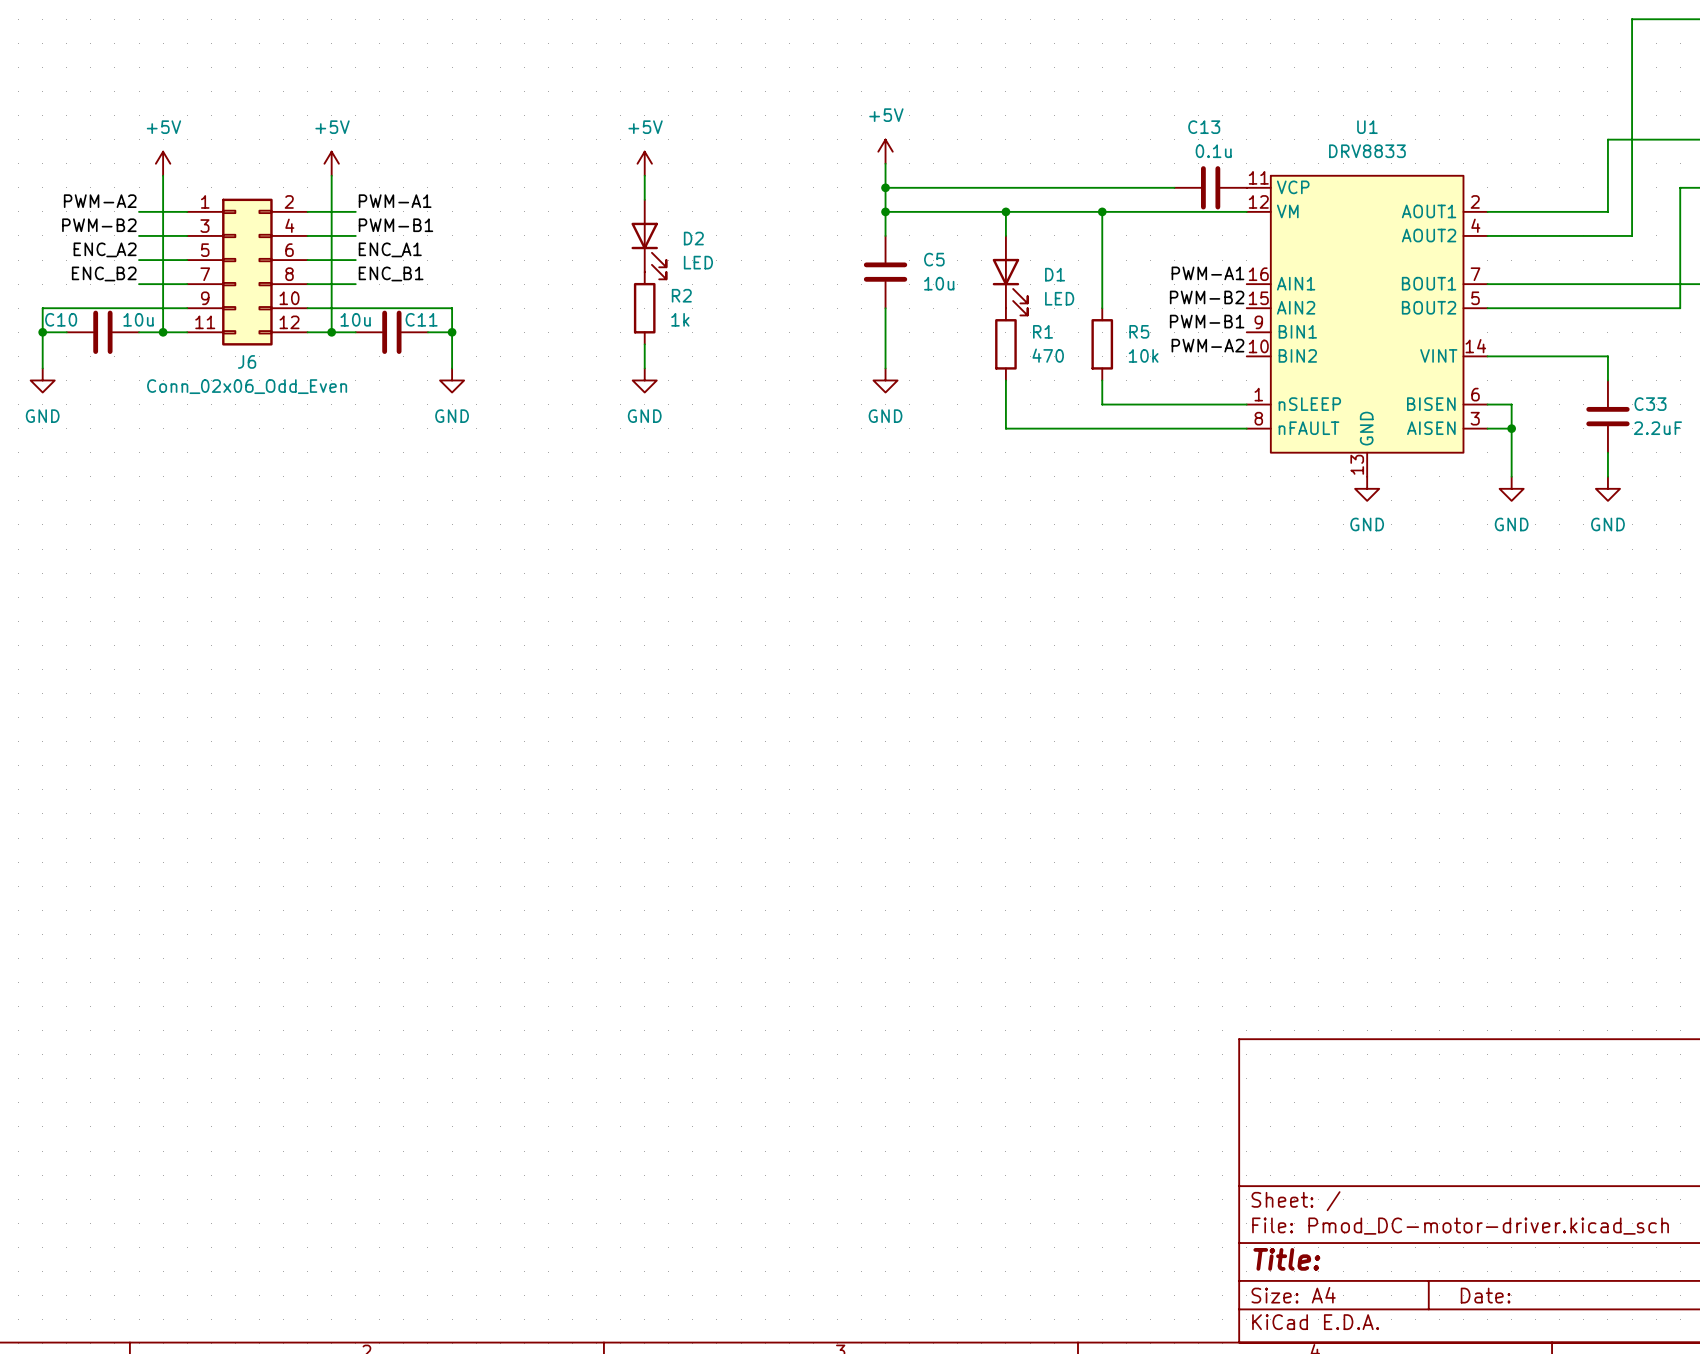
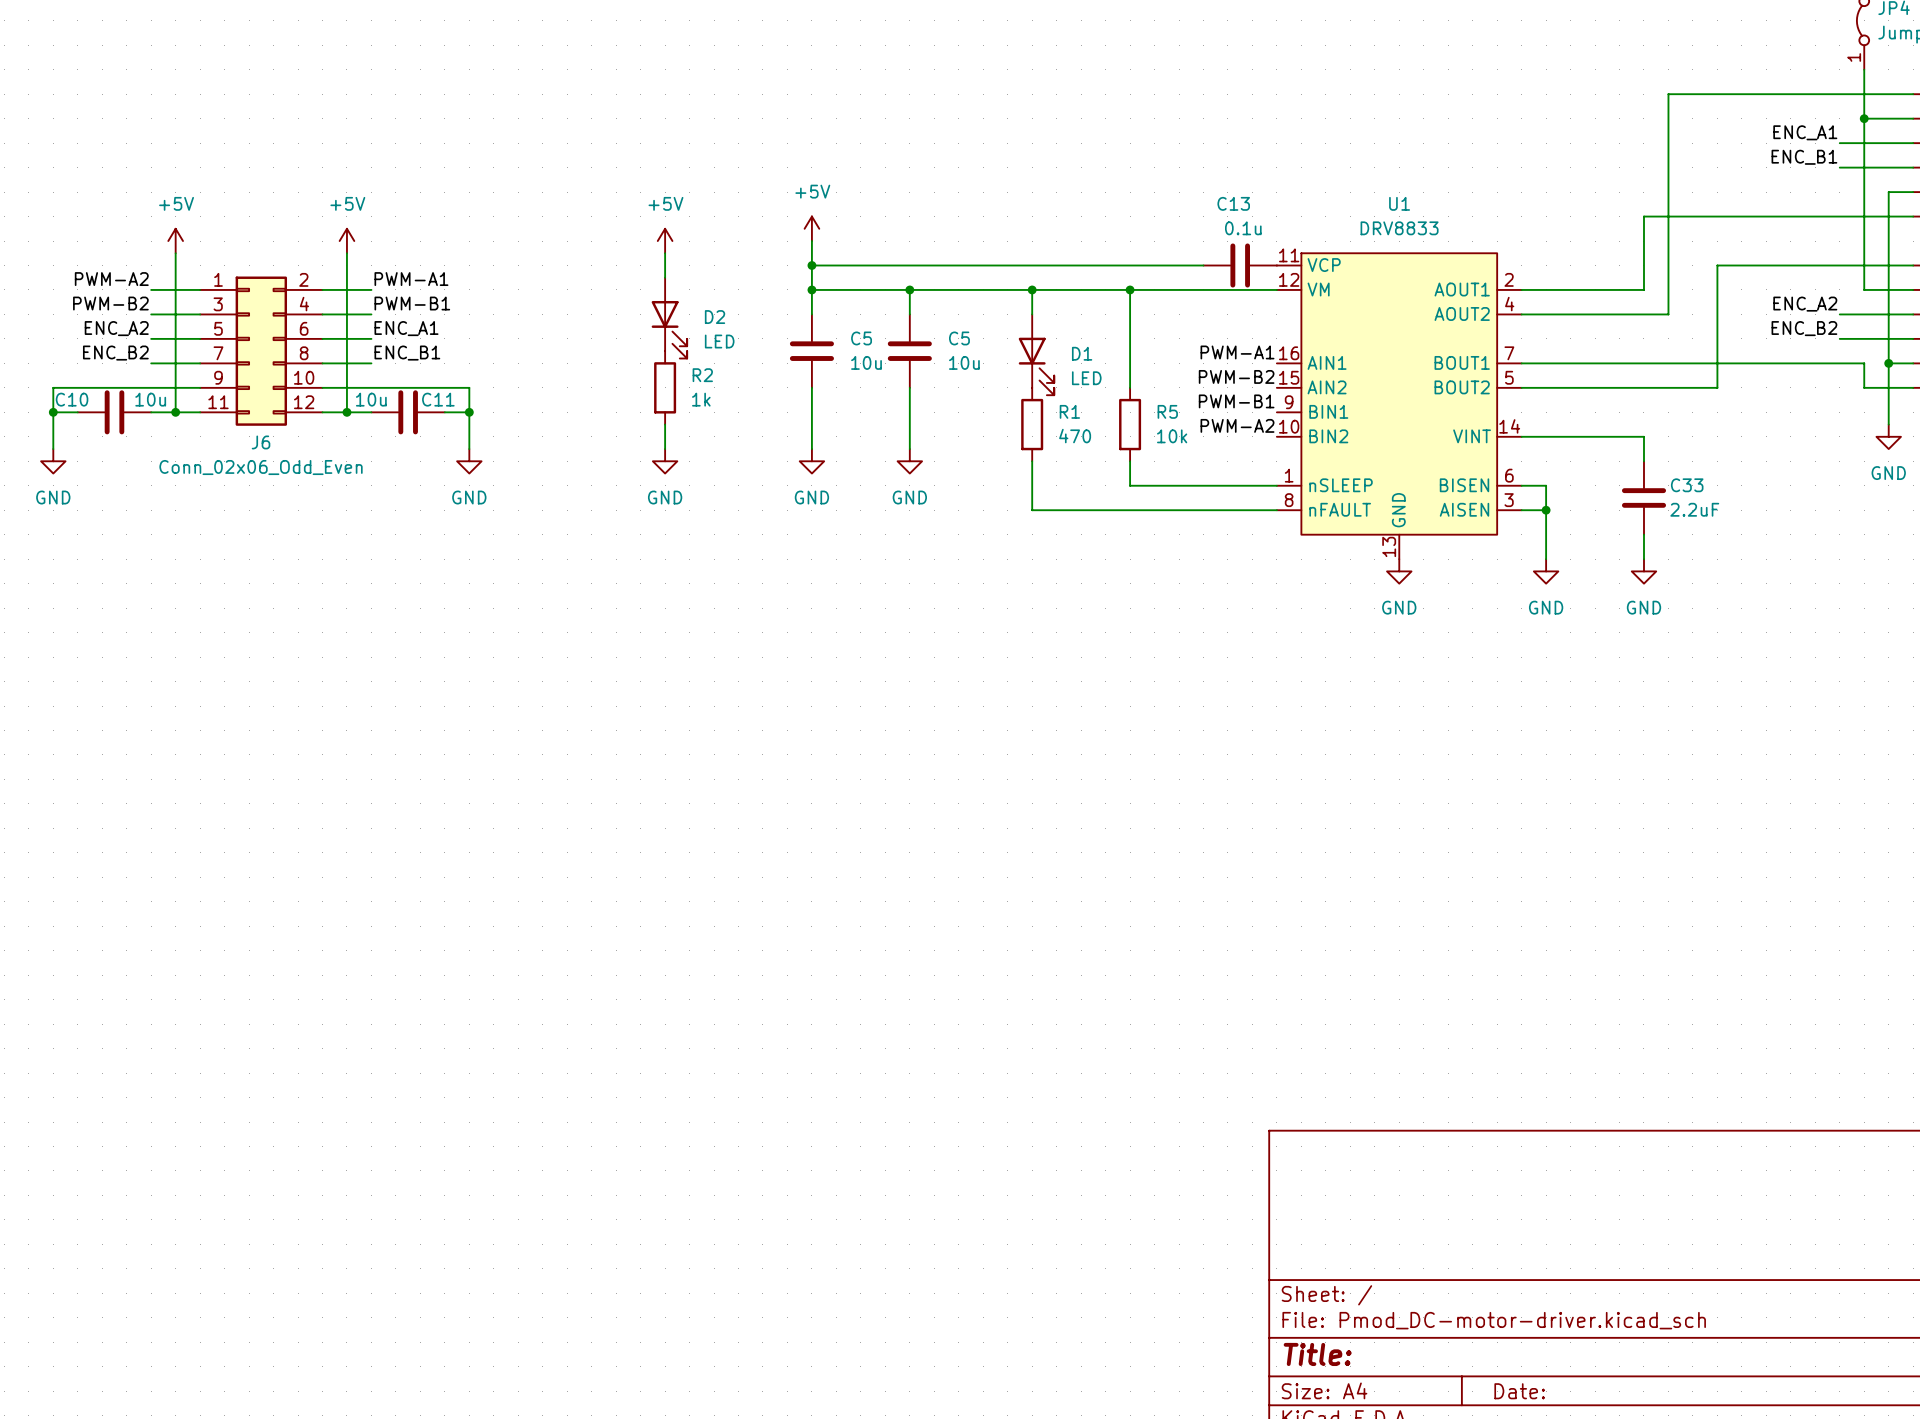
power symbol position: +5V (885, 151) -> +5V (811, 228)
wire: none -> (811, 241) (811, 314)
wire: (885, 163) (885, 211) -> (811, 289) (909, 289)
wire: none -> (811, 265) (909, 265)
junction: none -> (811, 265)
junction: (885, 187) -> none
junction: none -> (811, 289)
C5: none -> 10u (811, 351)
wire: none -> (811, 387) (811, 449)
power symbol: none -> GND (811, 461)

